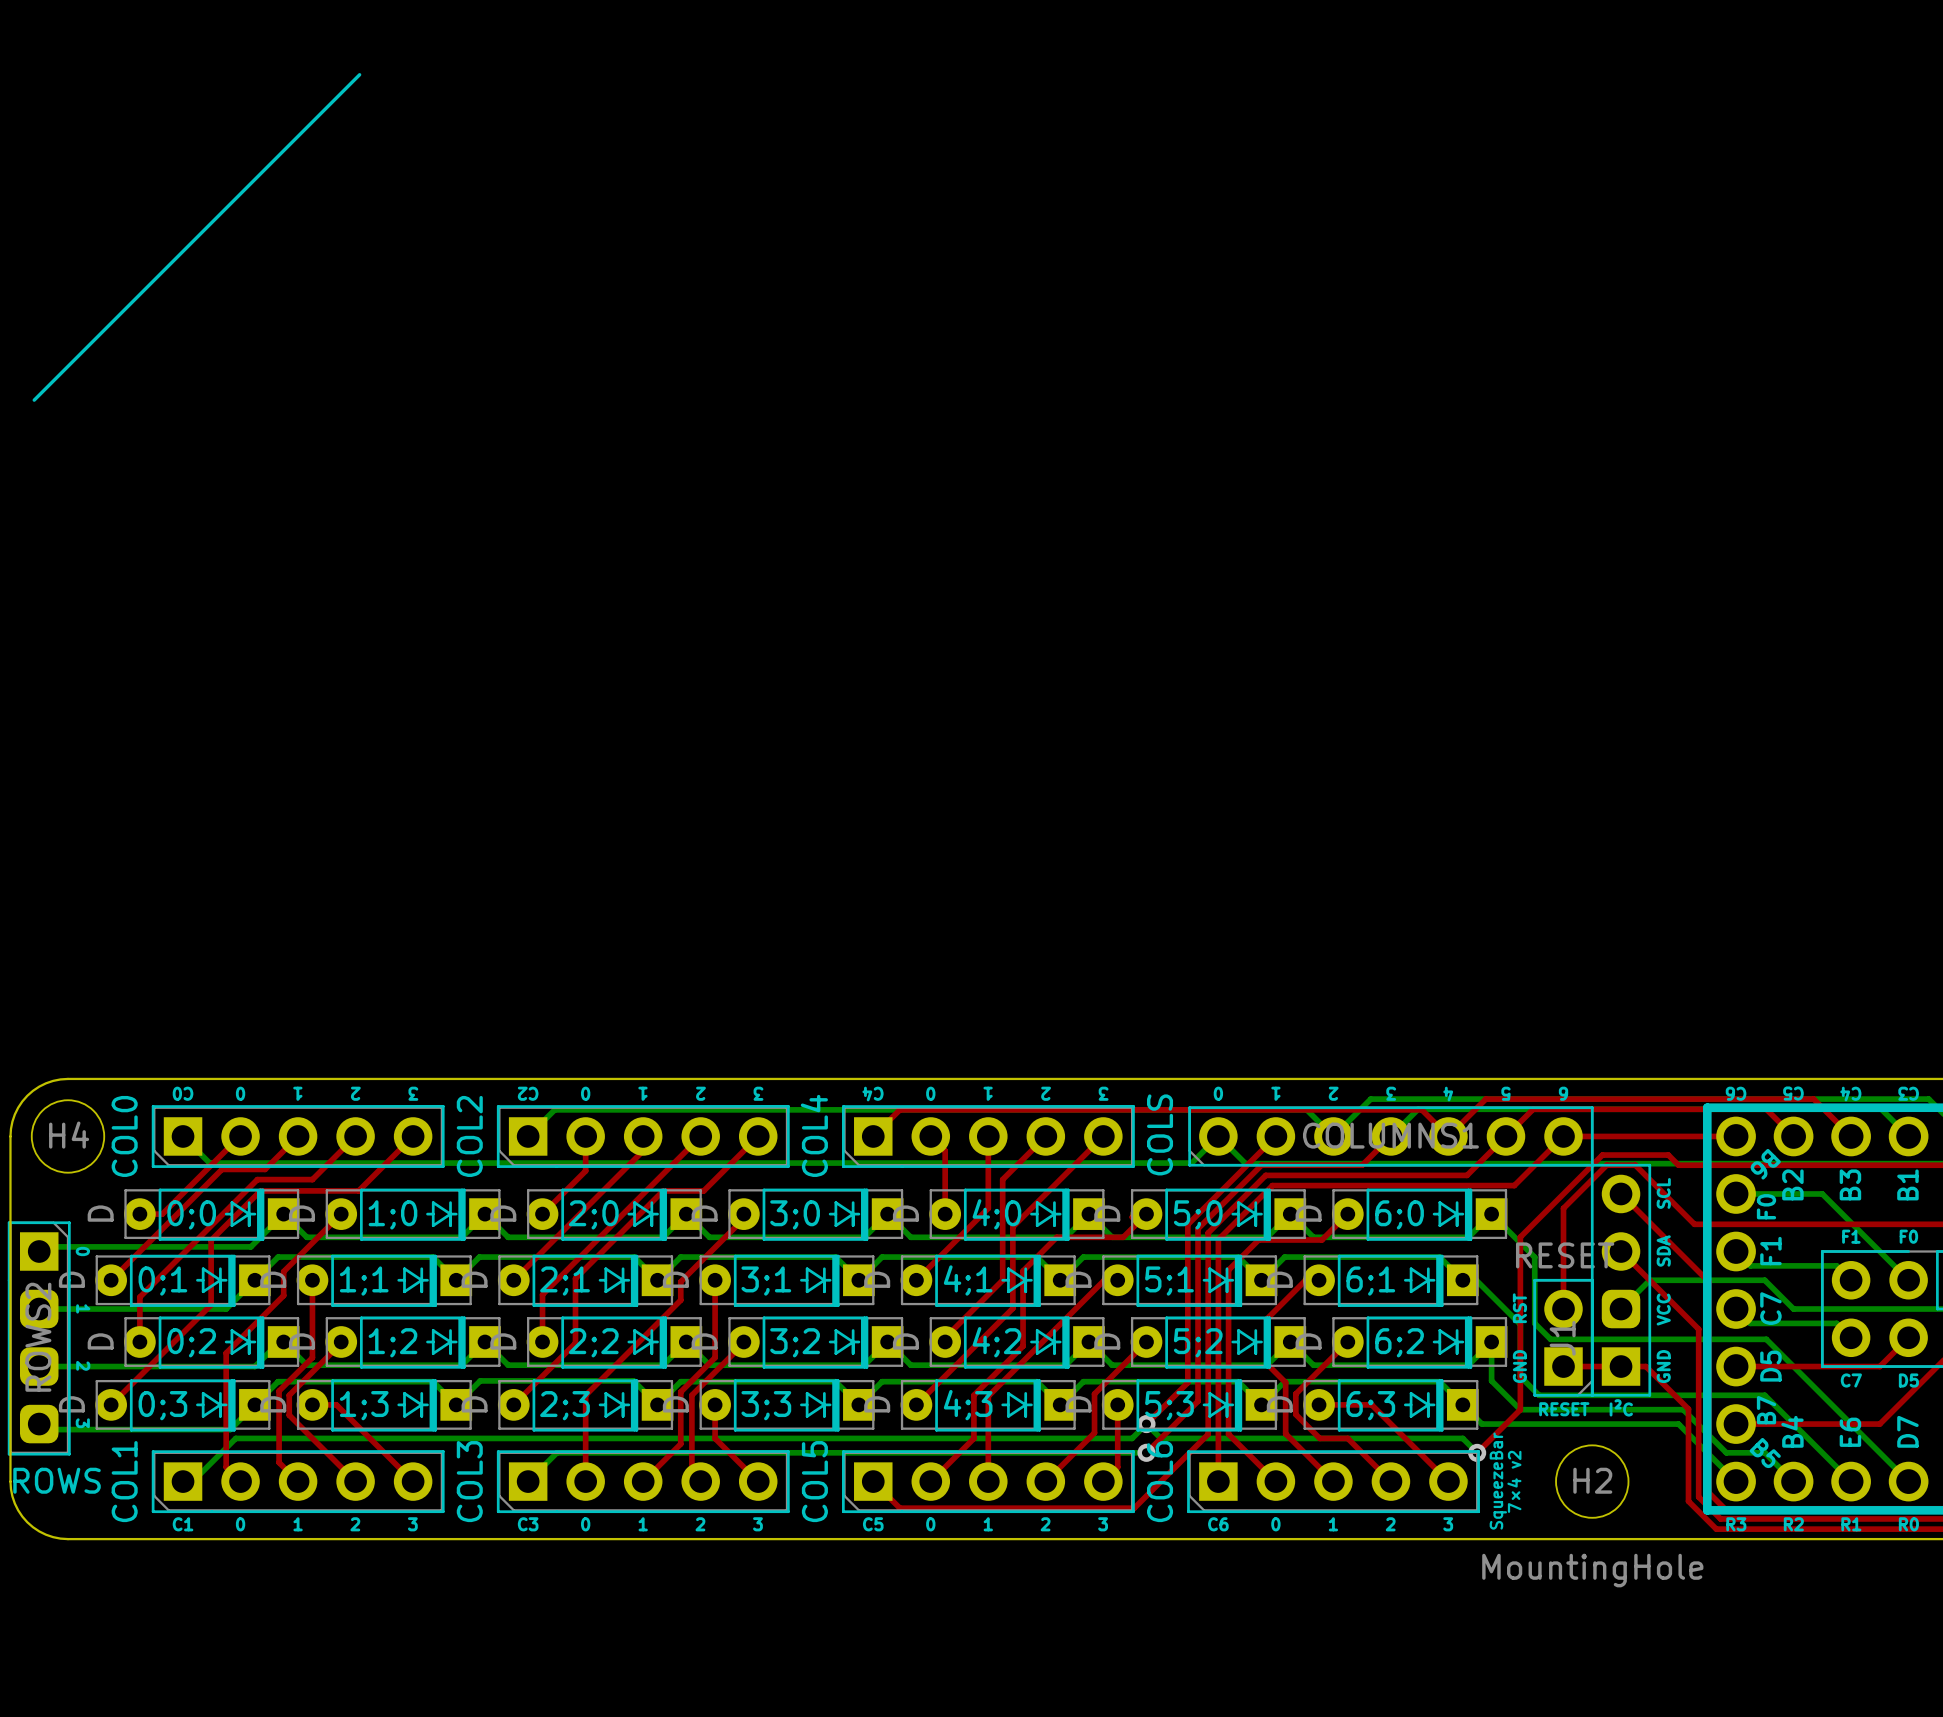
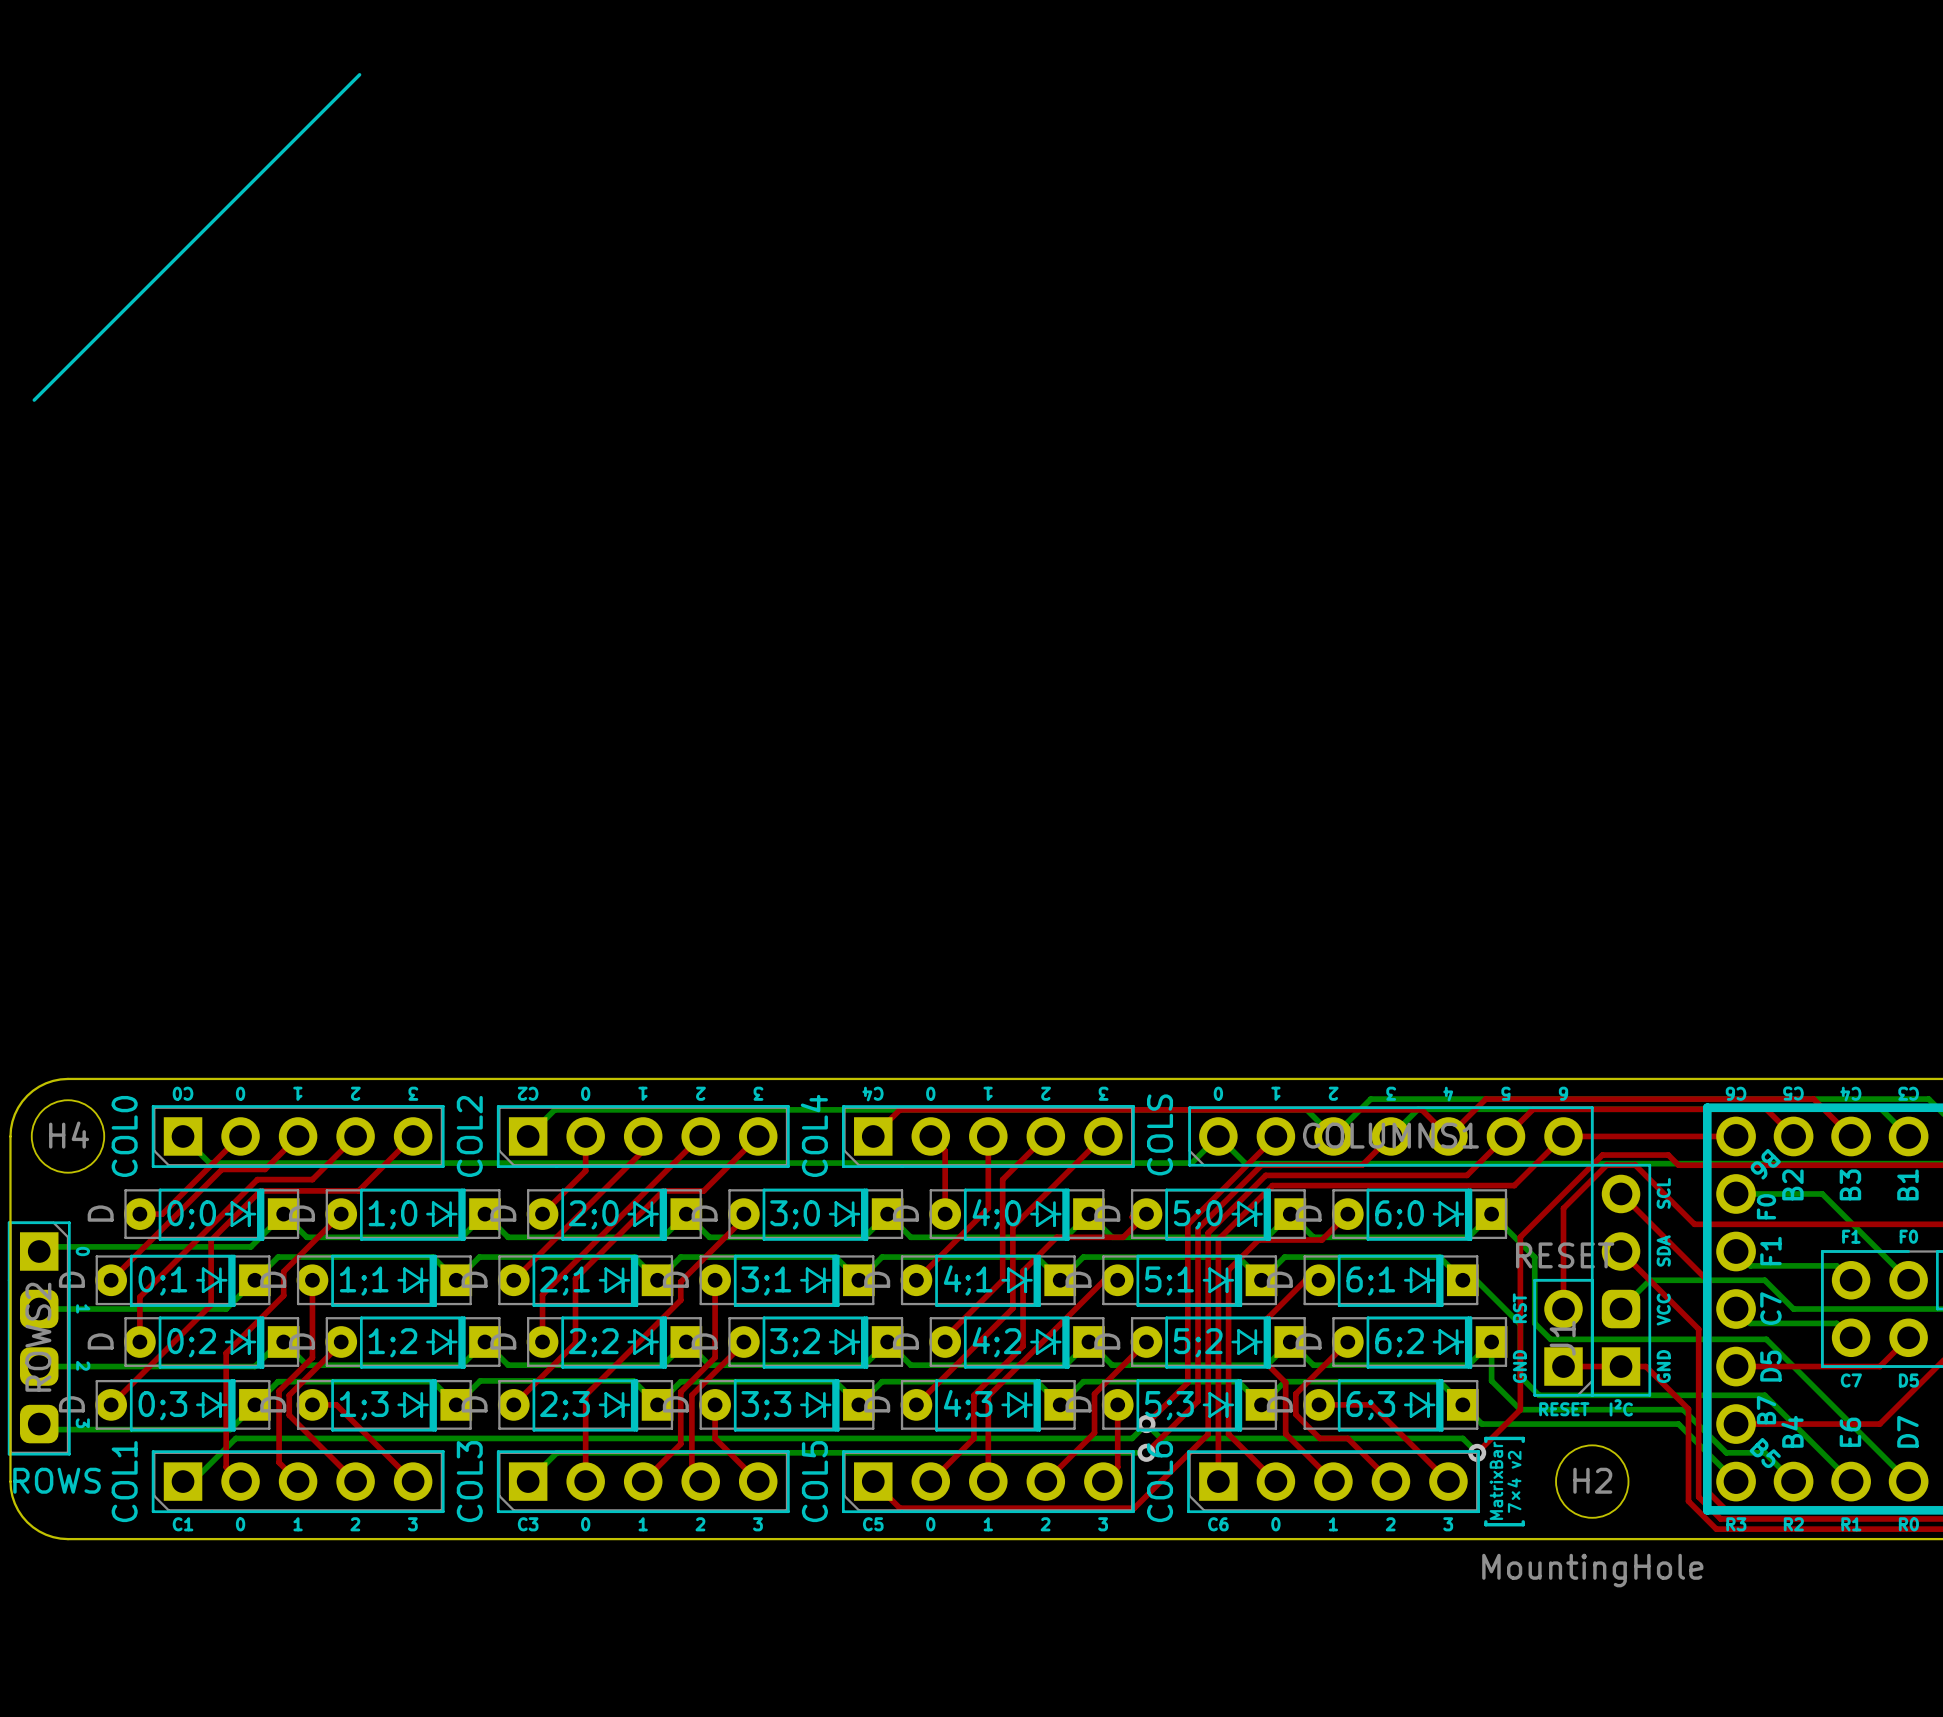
line: none -> (1485, 1441) (1485, 1438) (1523, 1438) (1523, 1441)
text: SqueezeBar (1498, 1481) -> MatrixBar (1496, 1480)
line: none -> (1485, 1521) (1485, 1524) (1523, 1524) (1523, 1521)

